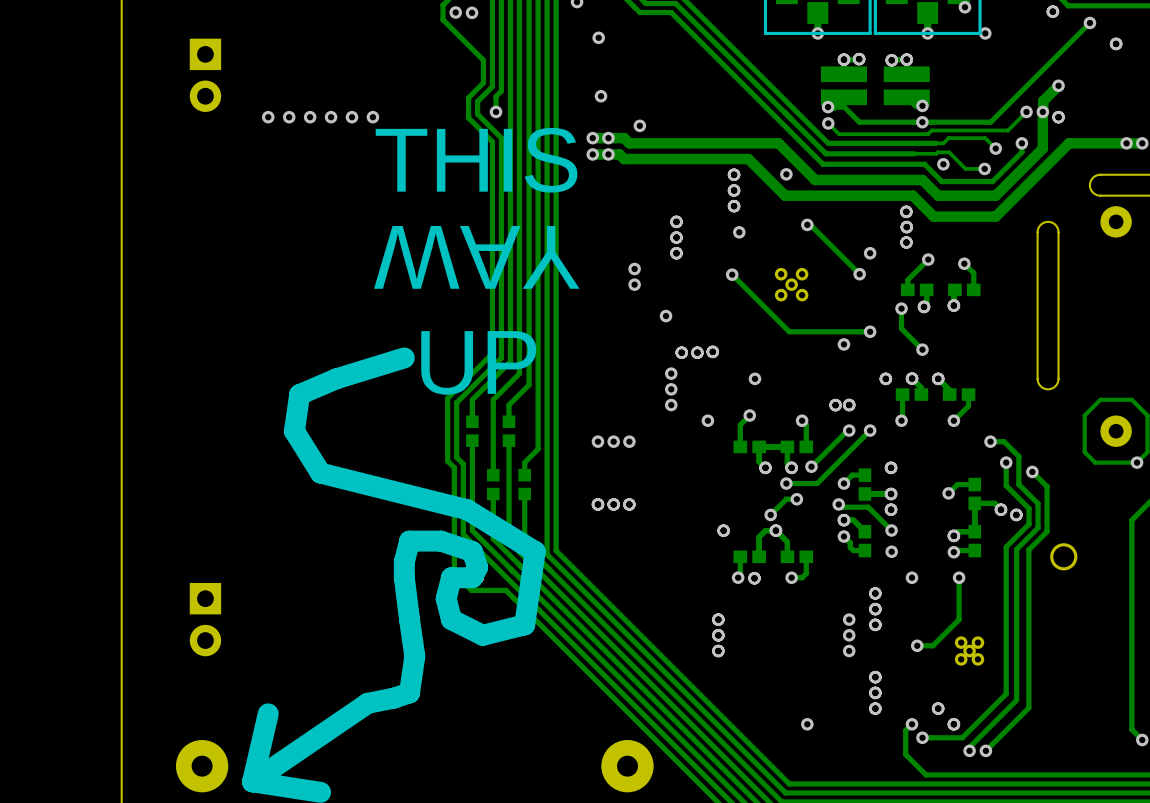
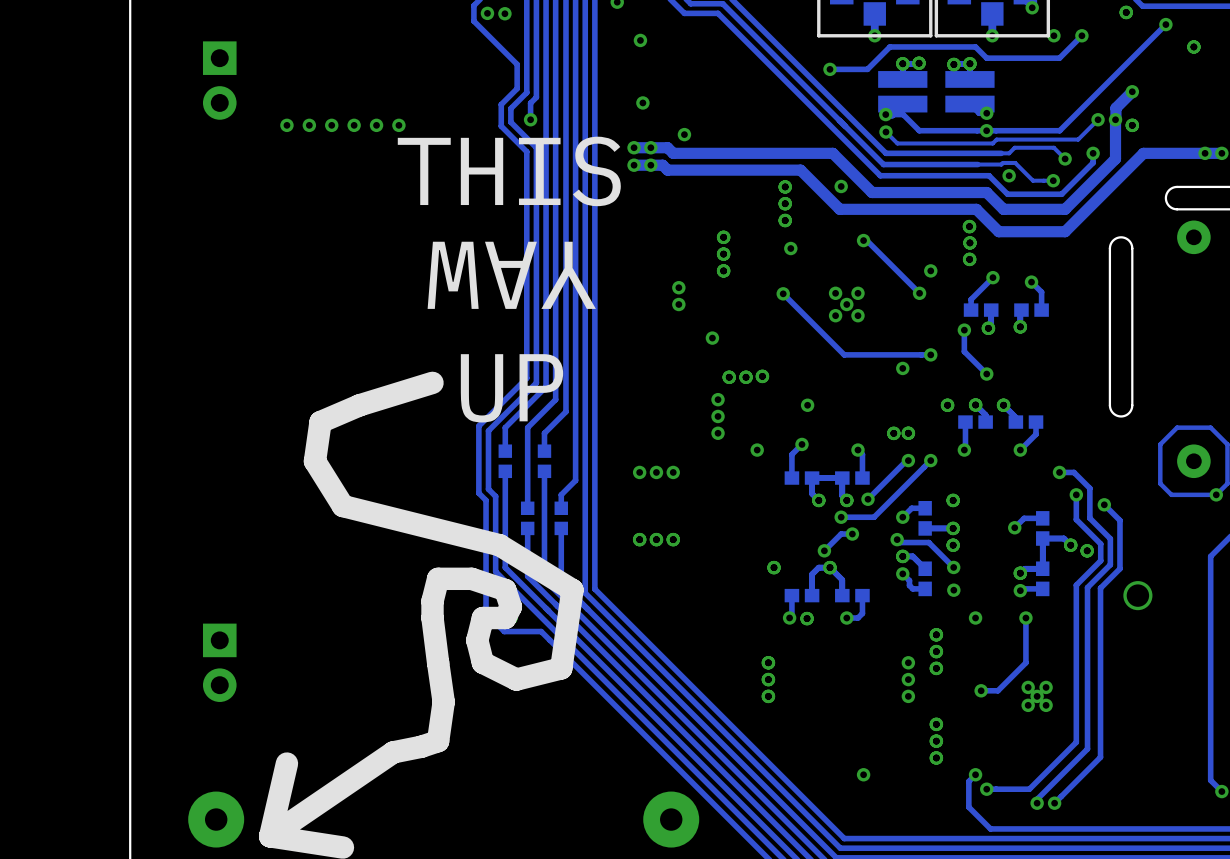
track: none -> (1081, 35) (1059, 58) (986, 58) (975, 46) (889, 46) (867, 69) (829, 69)
via: none -> (1081, 35)
via: none -> (829, 69)
via: (938, 708) -> none
via: (953, 724) -> none

